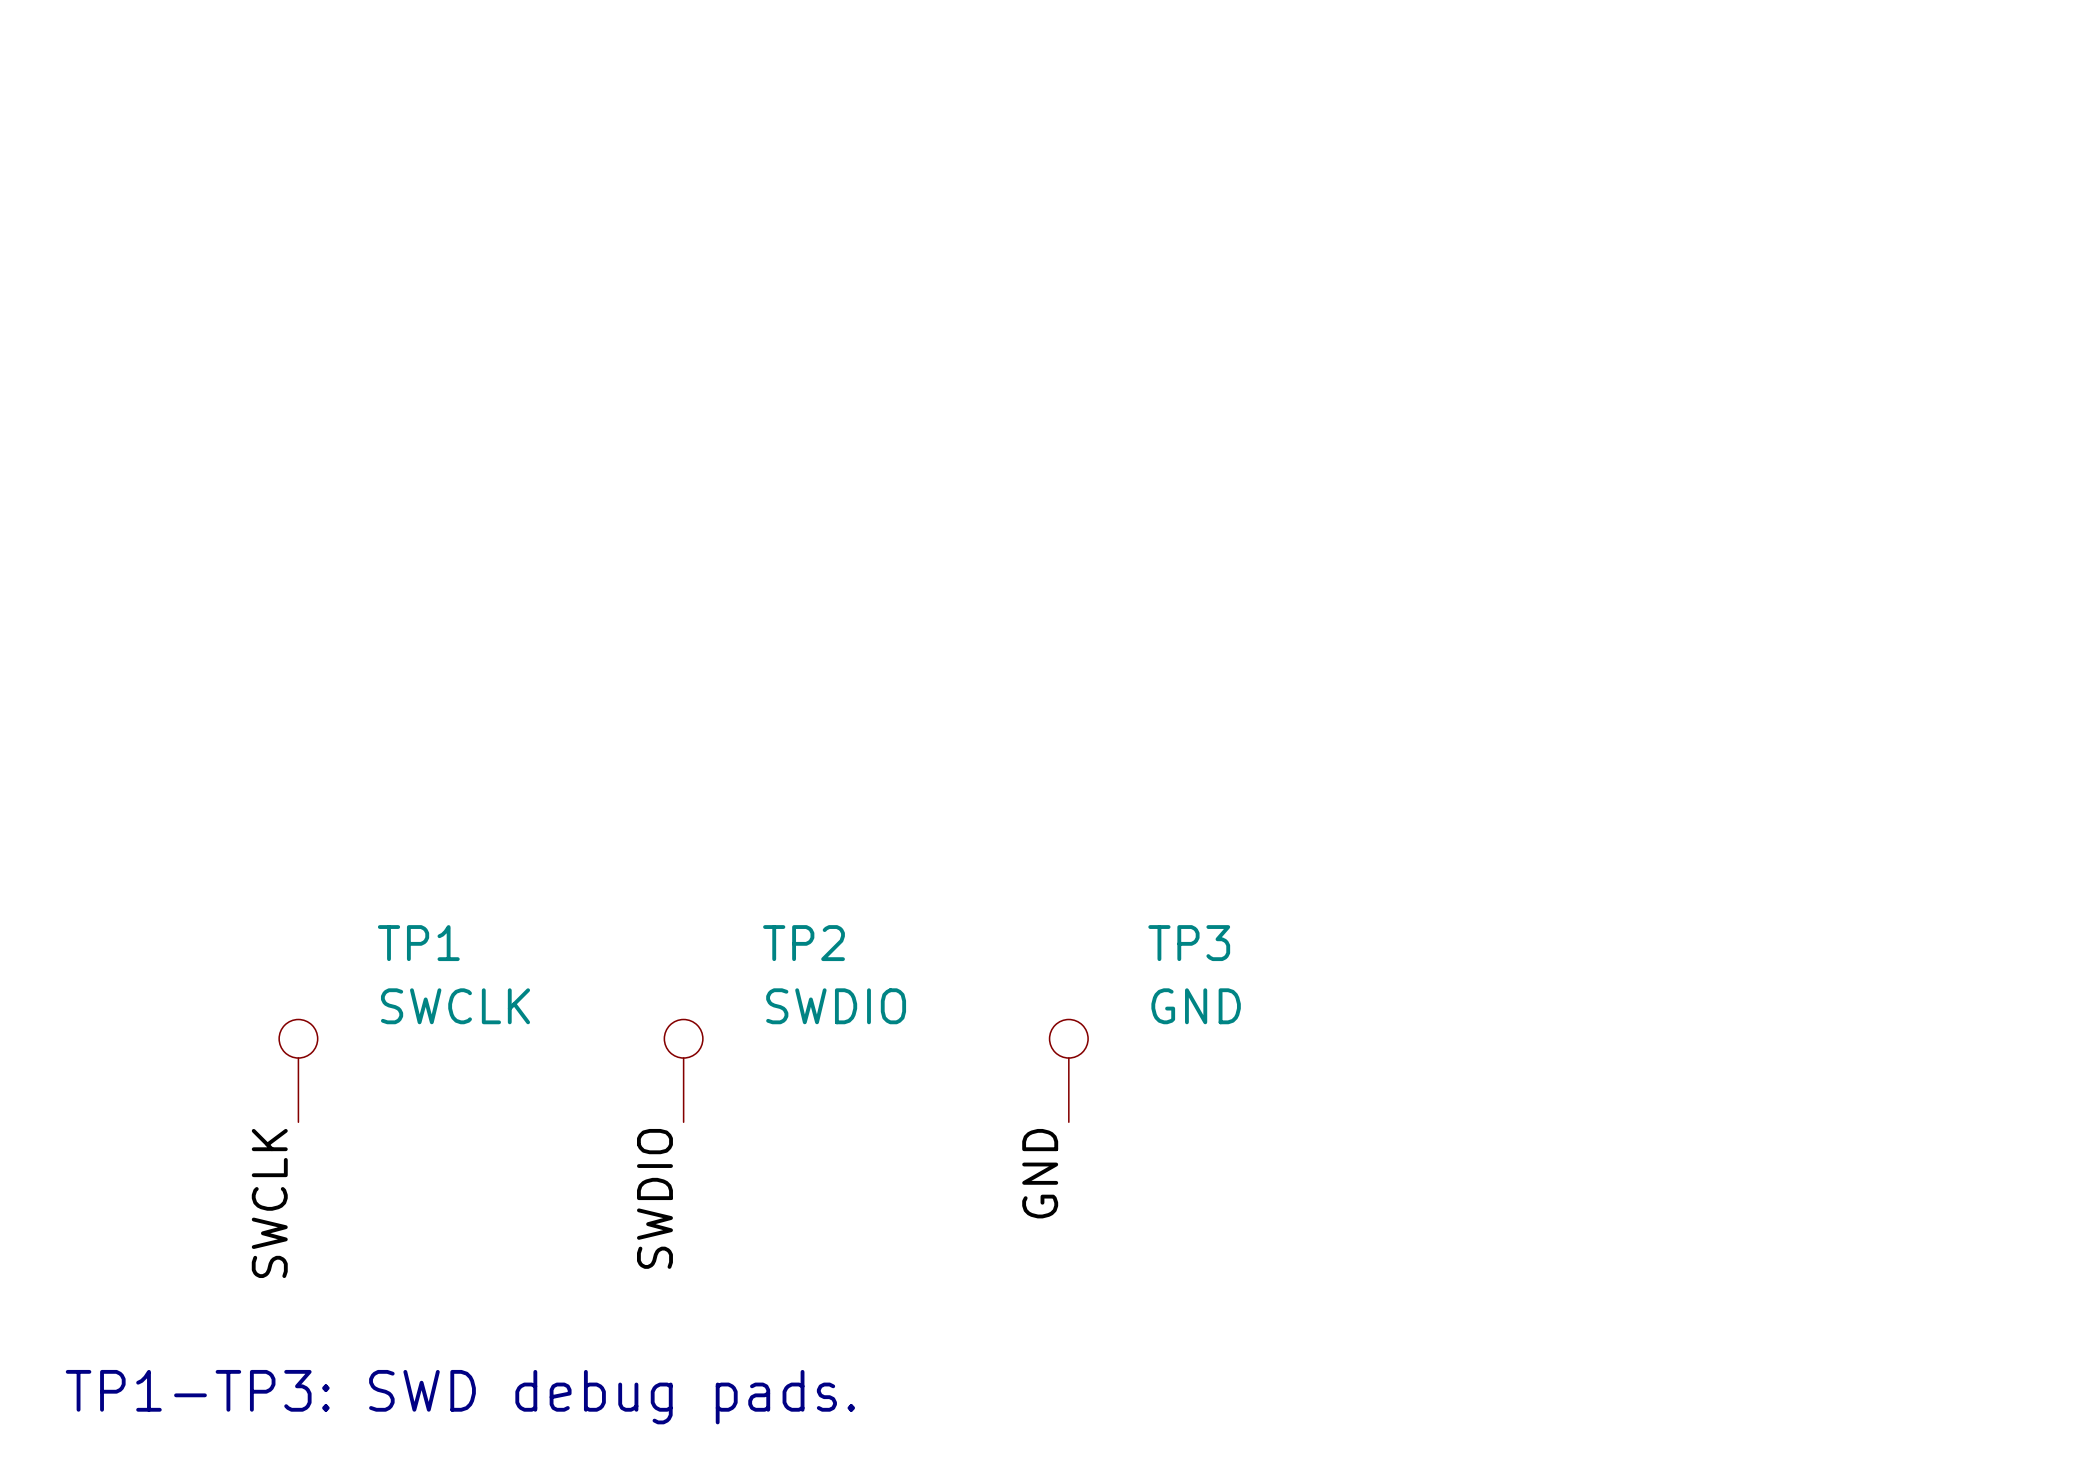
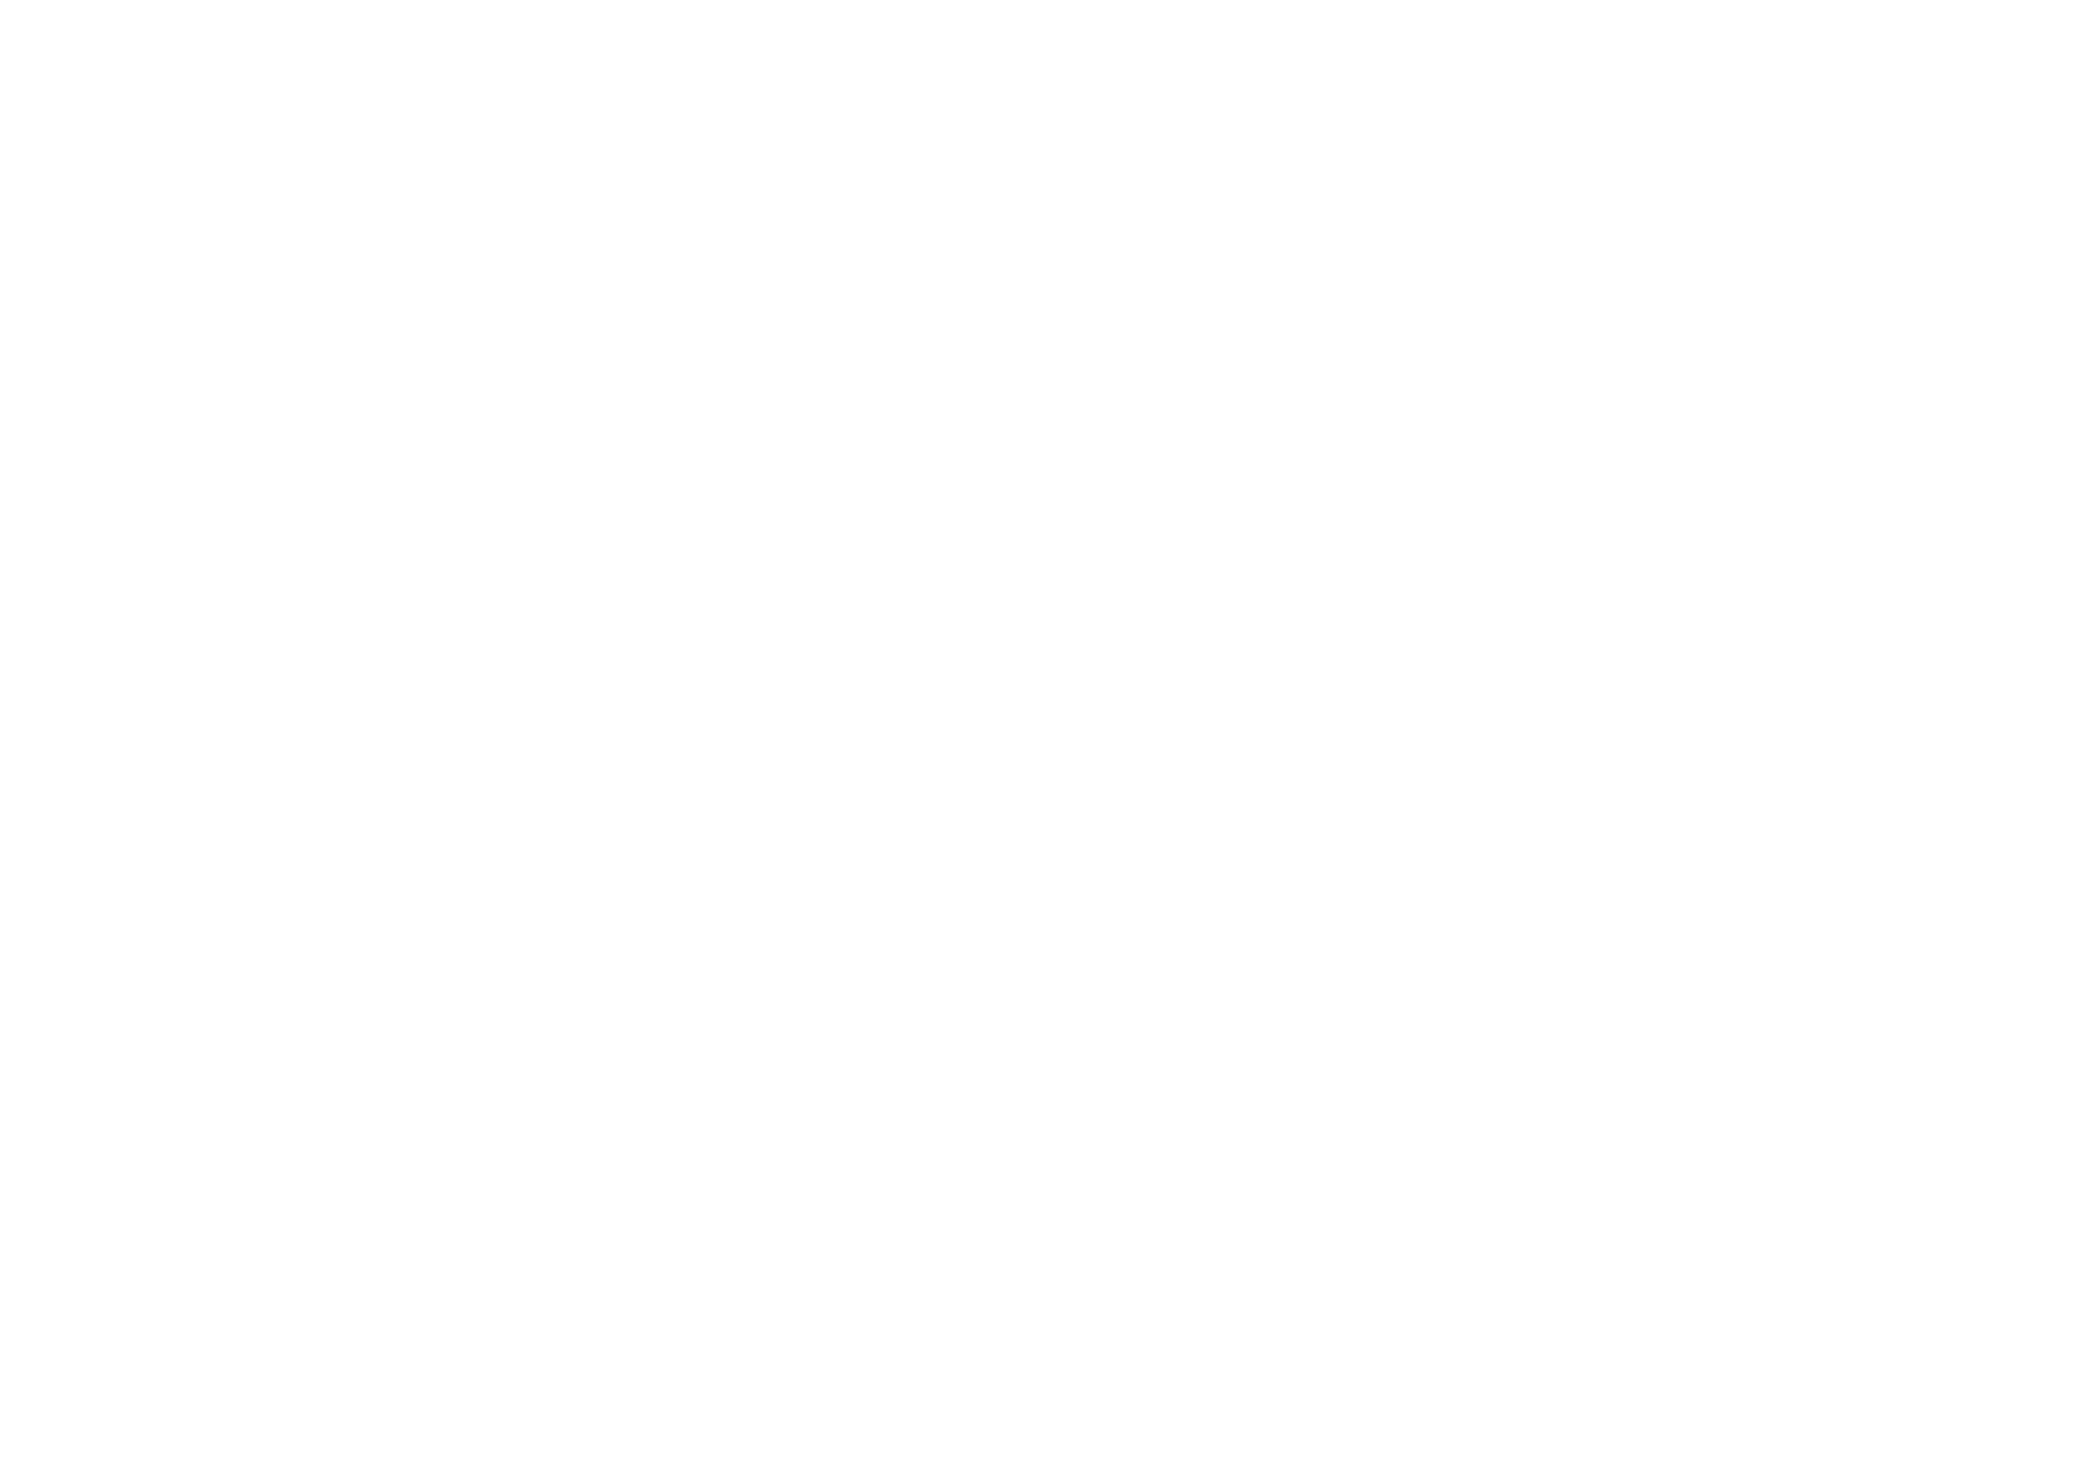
TP1: SWCLK (298, 1070) -> none
TP2: SWDIO (683, 1070) -> none
TP3: GND (1068, 1070) -> none
label: GND (1040, 1173) -> none
label: SWDIO (654, 1198) -> none
label: SWCLK (269, 1203) -> none
text: TP1-TP3: SWD debug pads. (460, 1397) -> none

